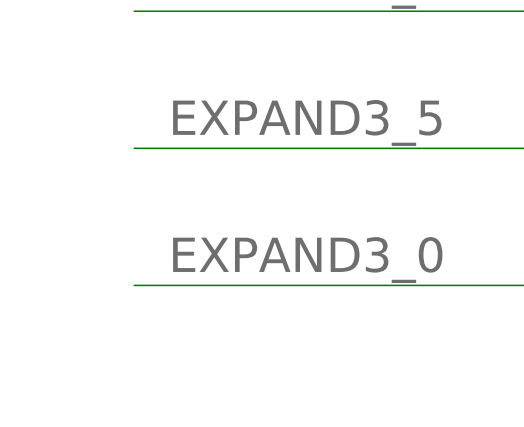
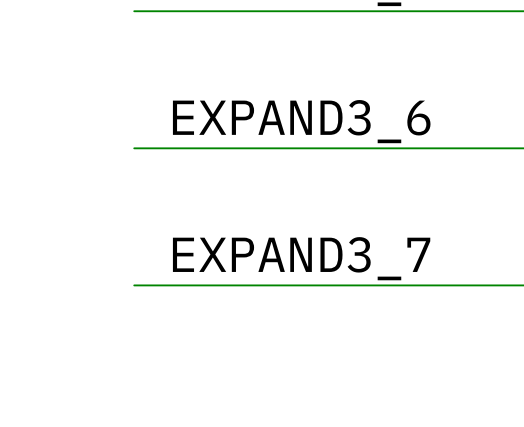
label: EXPAND3_5 (307, 122) -> EXPAND3_6 (301, 121)
label: EXPAND3_0 (307, 260) -> EXPAND3_7 (301, 258)

